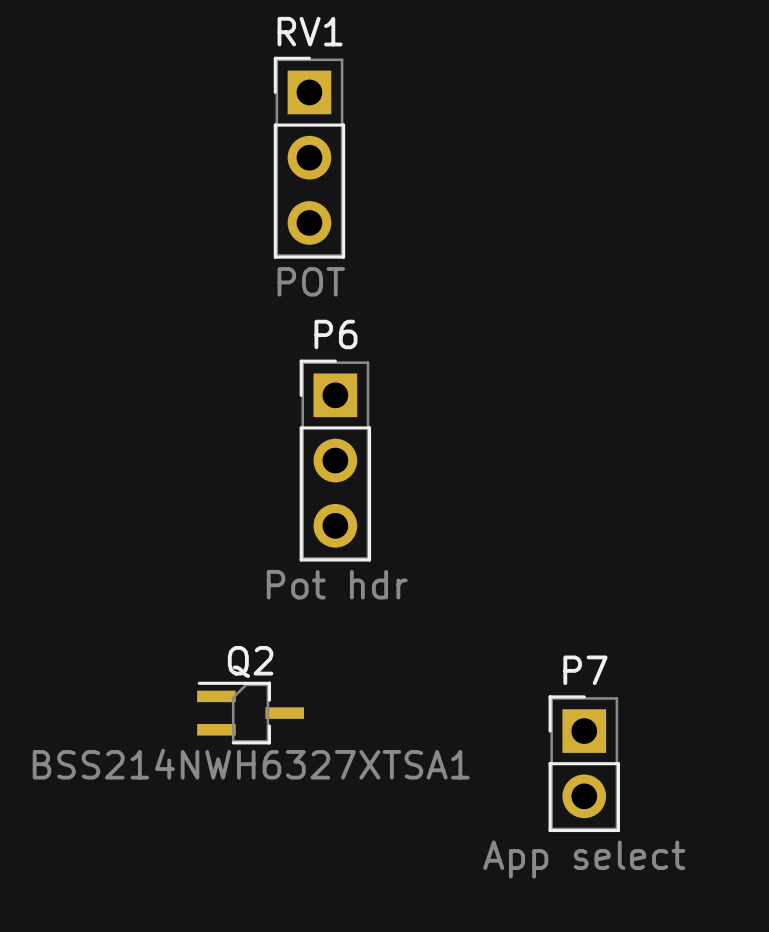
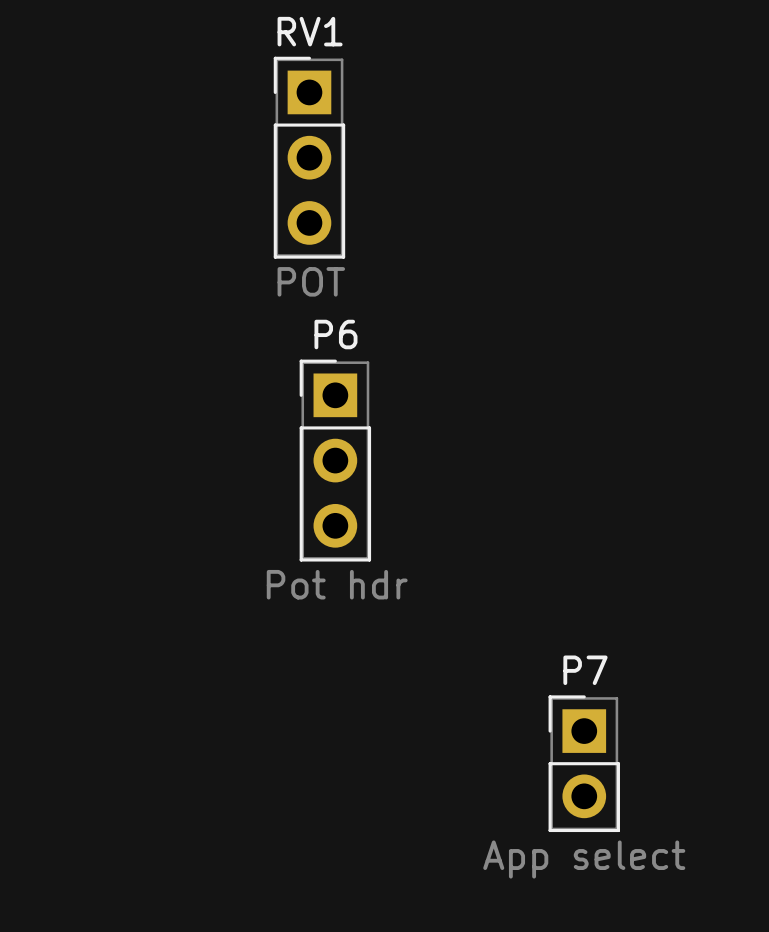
Q2: BSS214NWH6327XTSA1 (250, 712) -> none

